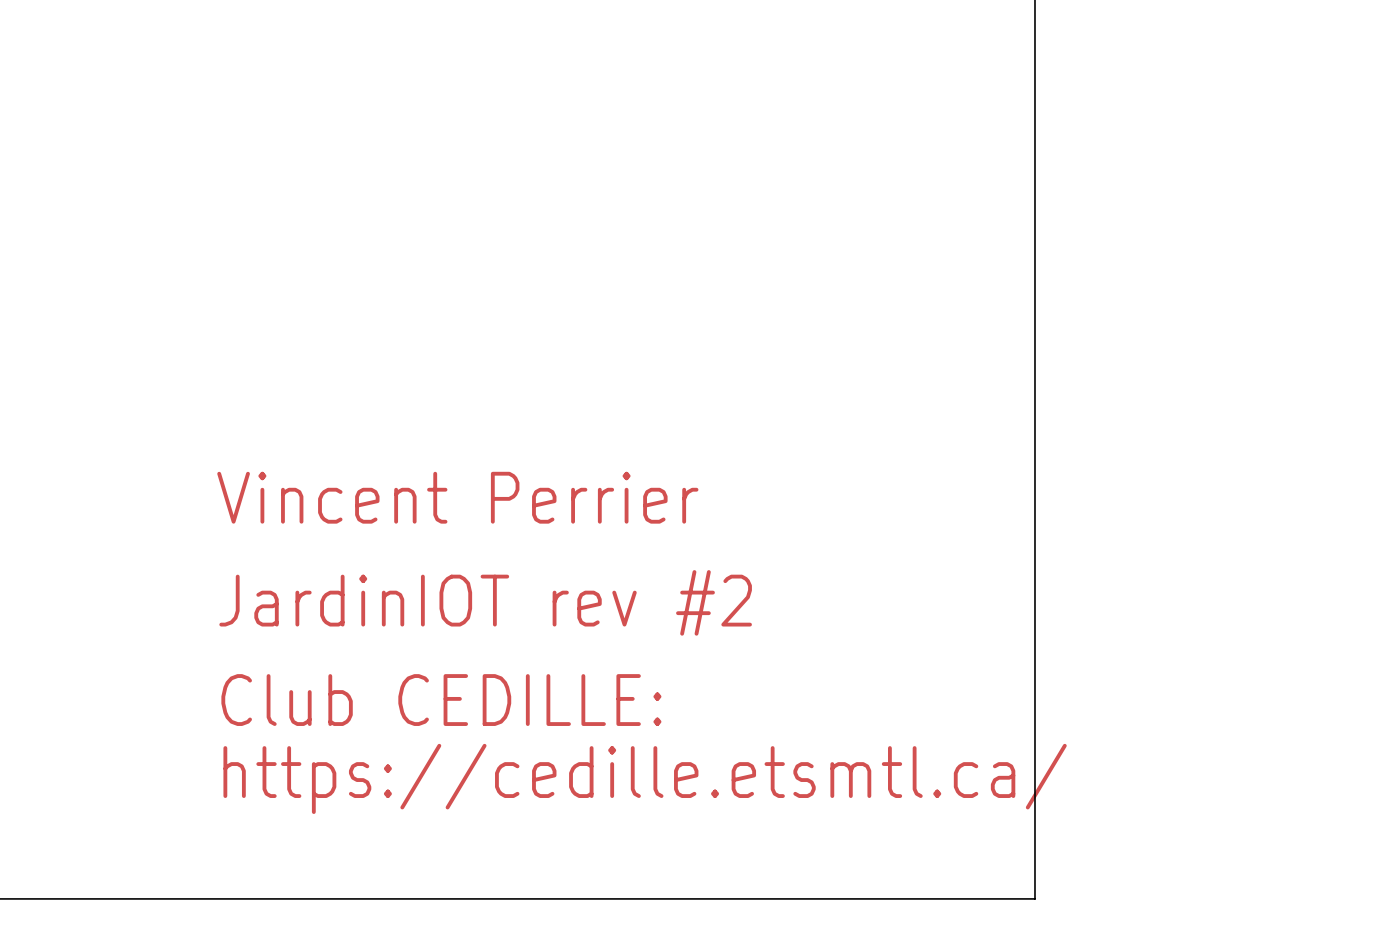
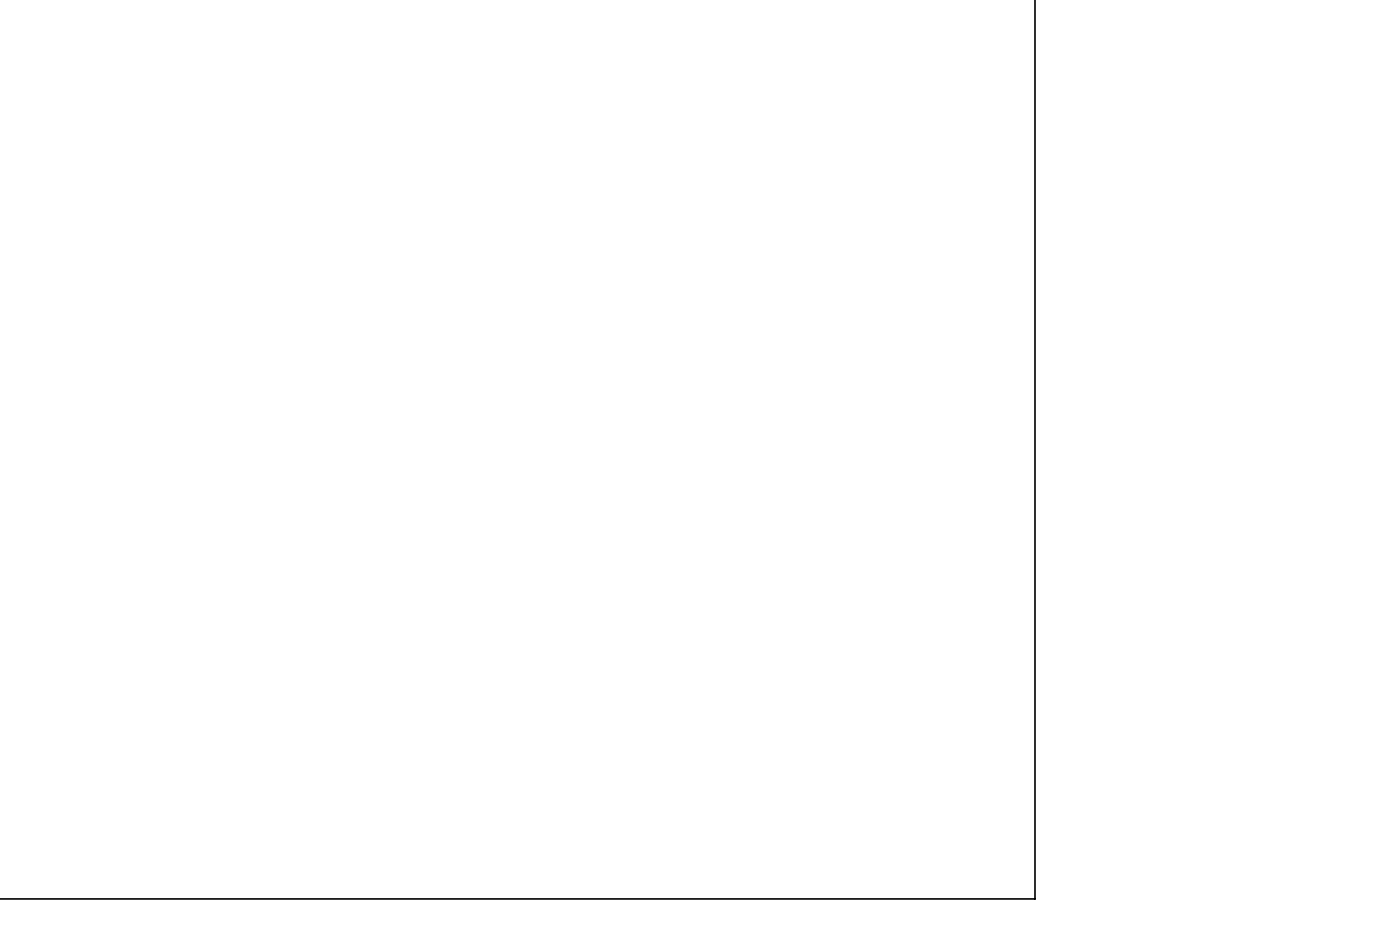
text: Vincent Perrier (457, 497) -> none
text: JardinIOT rev #2 (485, 602) -> none
text: Club CEDILLE: (441, 700) -> none
text: https://cedille.etsmtl.ca/ (645, 778) -> none

